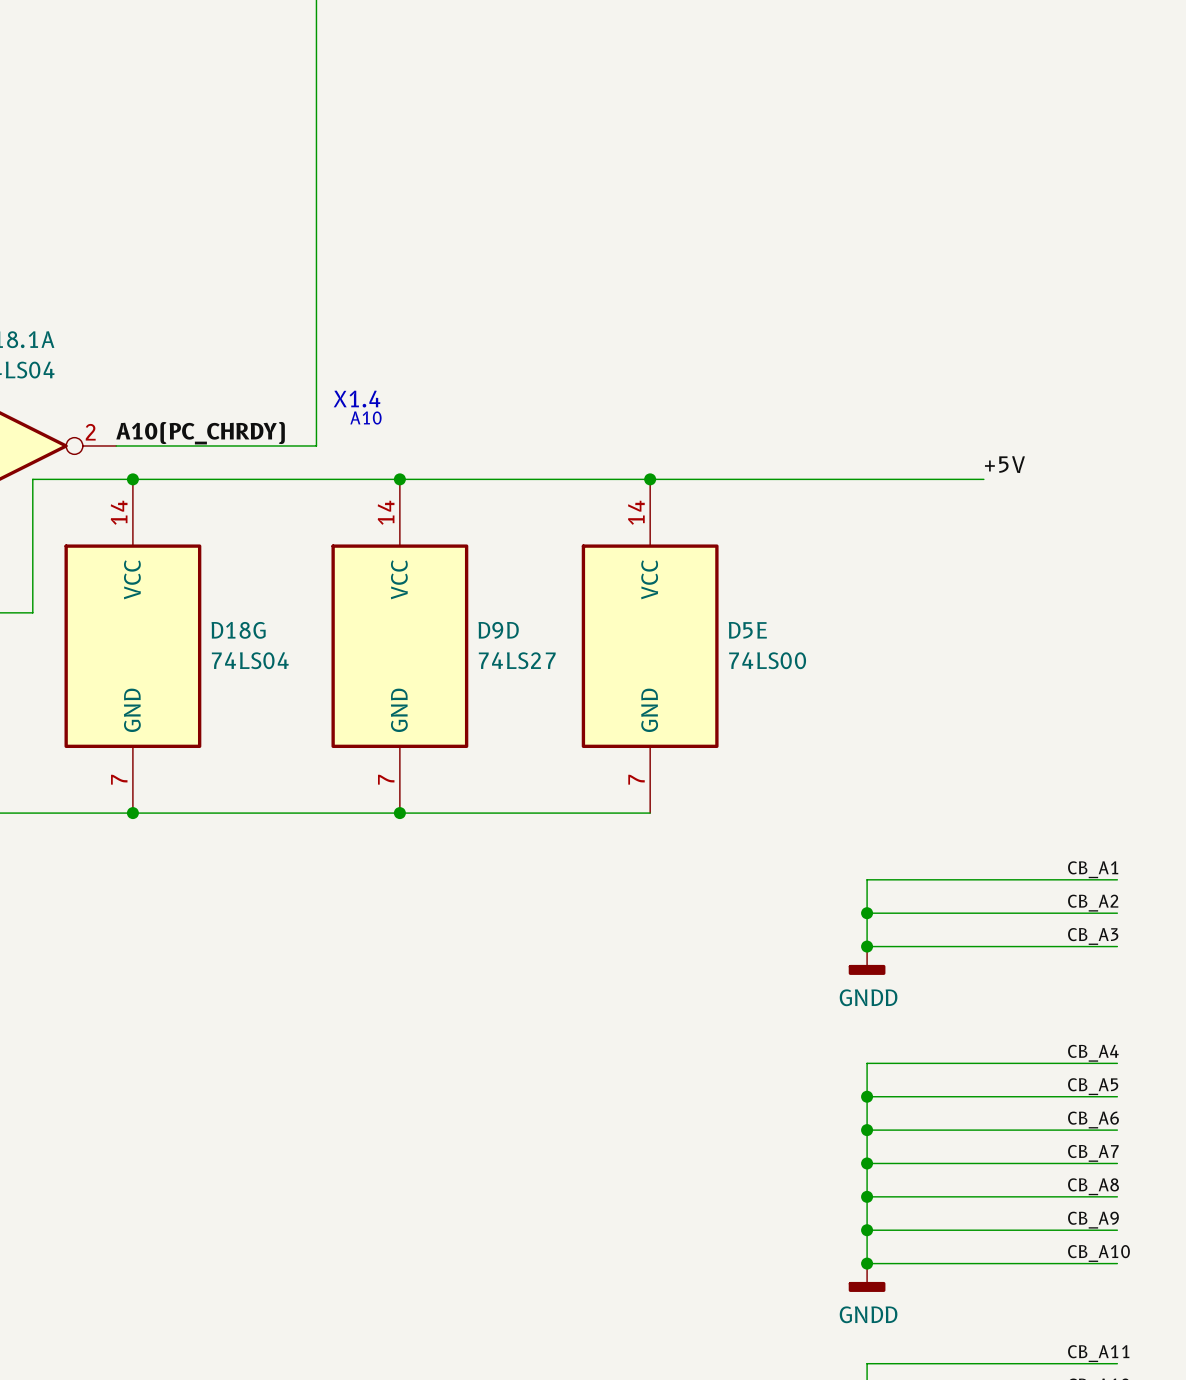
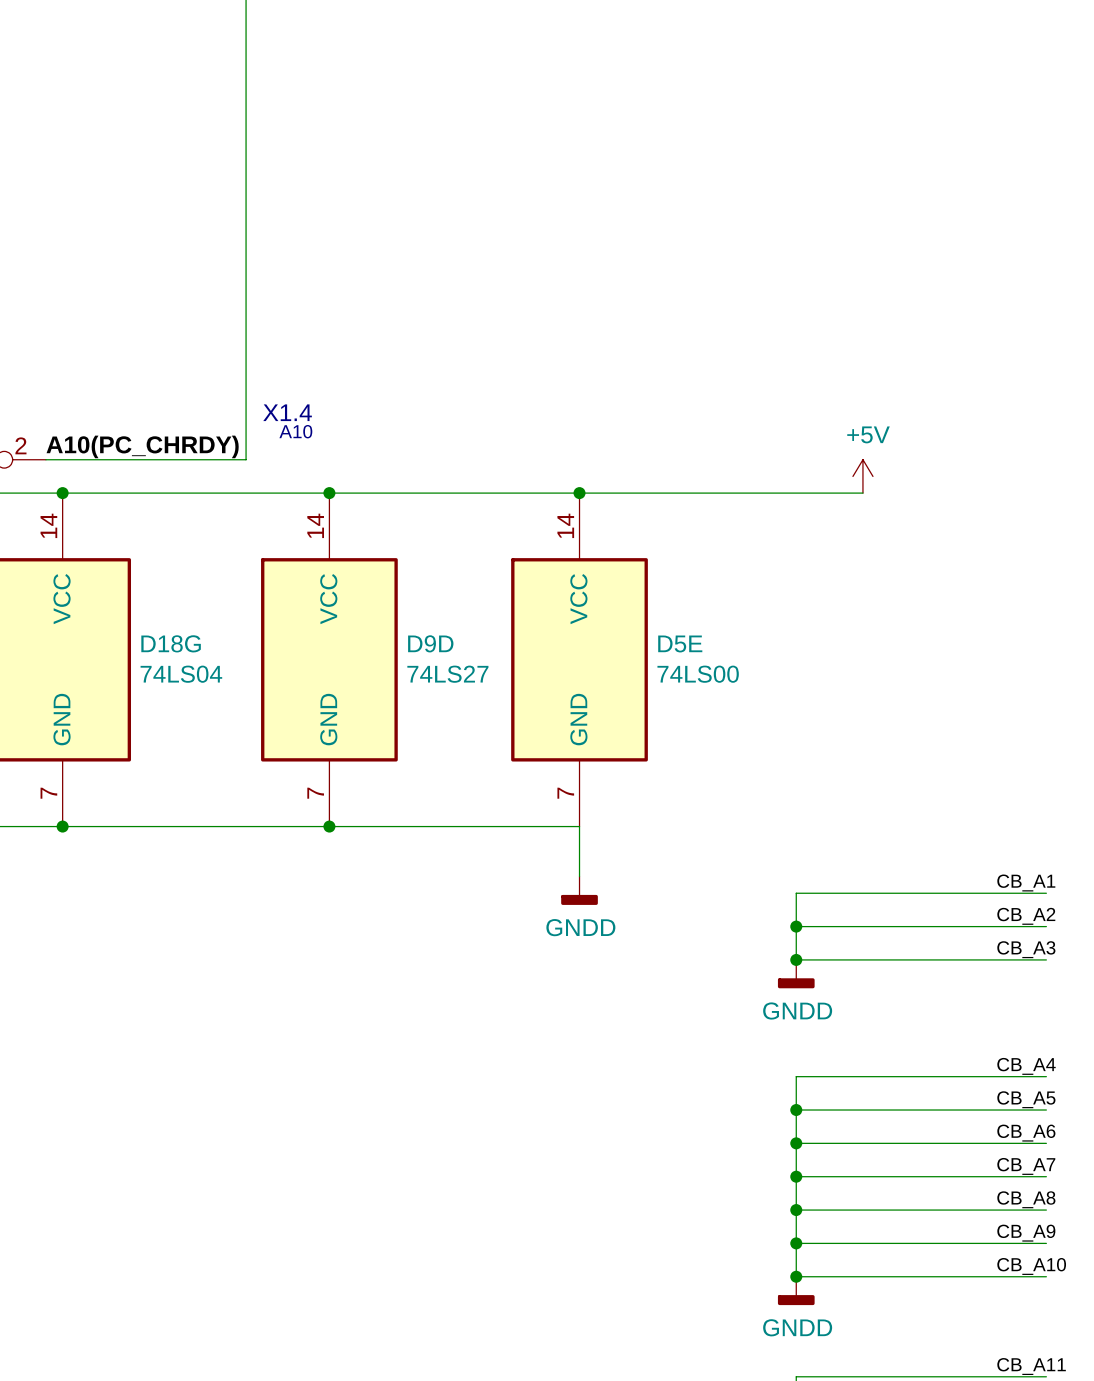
power symbol: none -> +5V (862, 476)
label: +5V (1004, 464) -> none
wire: (933, 479) (983, 479) -> none
wire: none -> (579, 826) (579, 876)
power symbol: none -> GNDD (579, 890)

